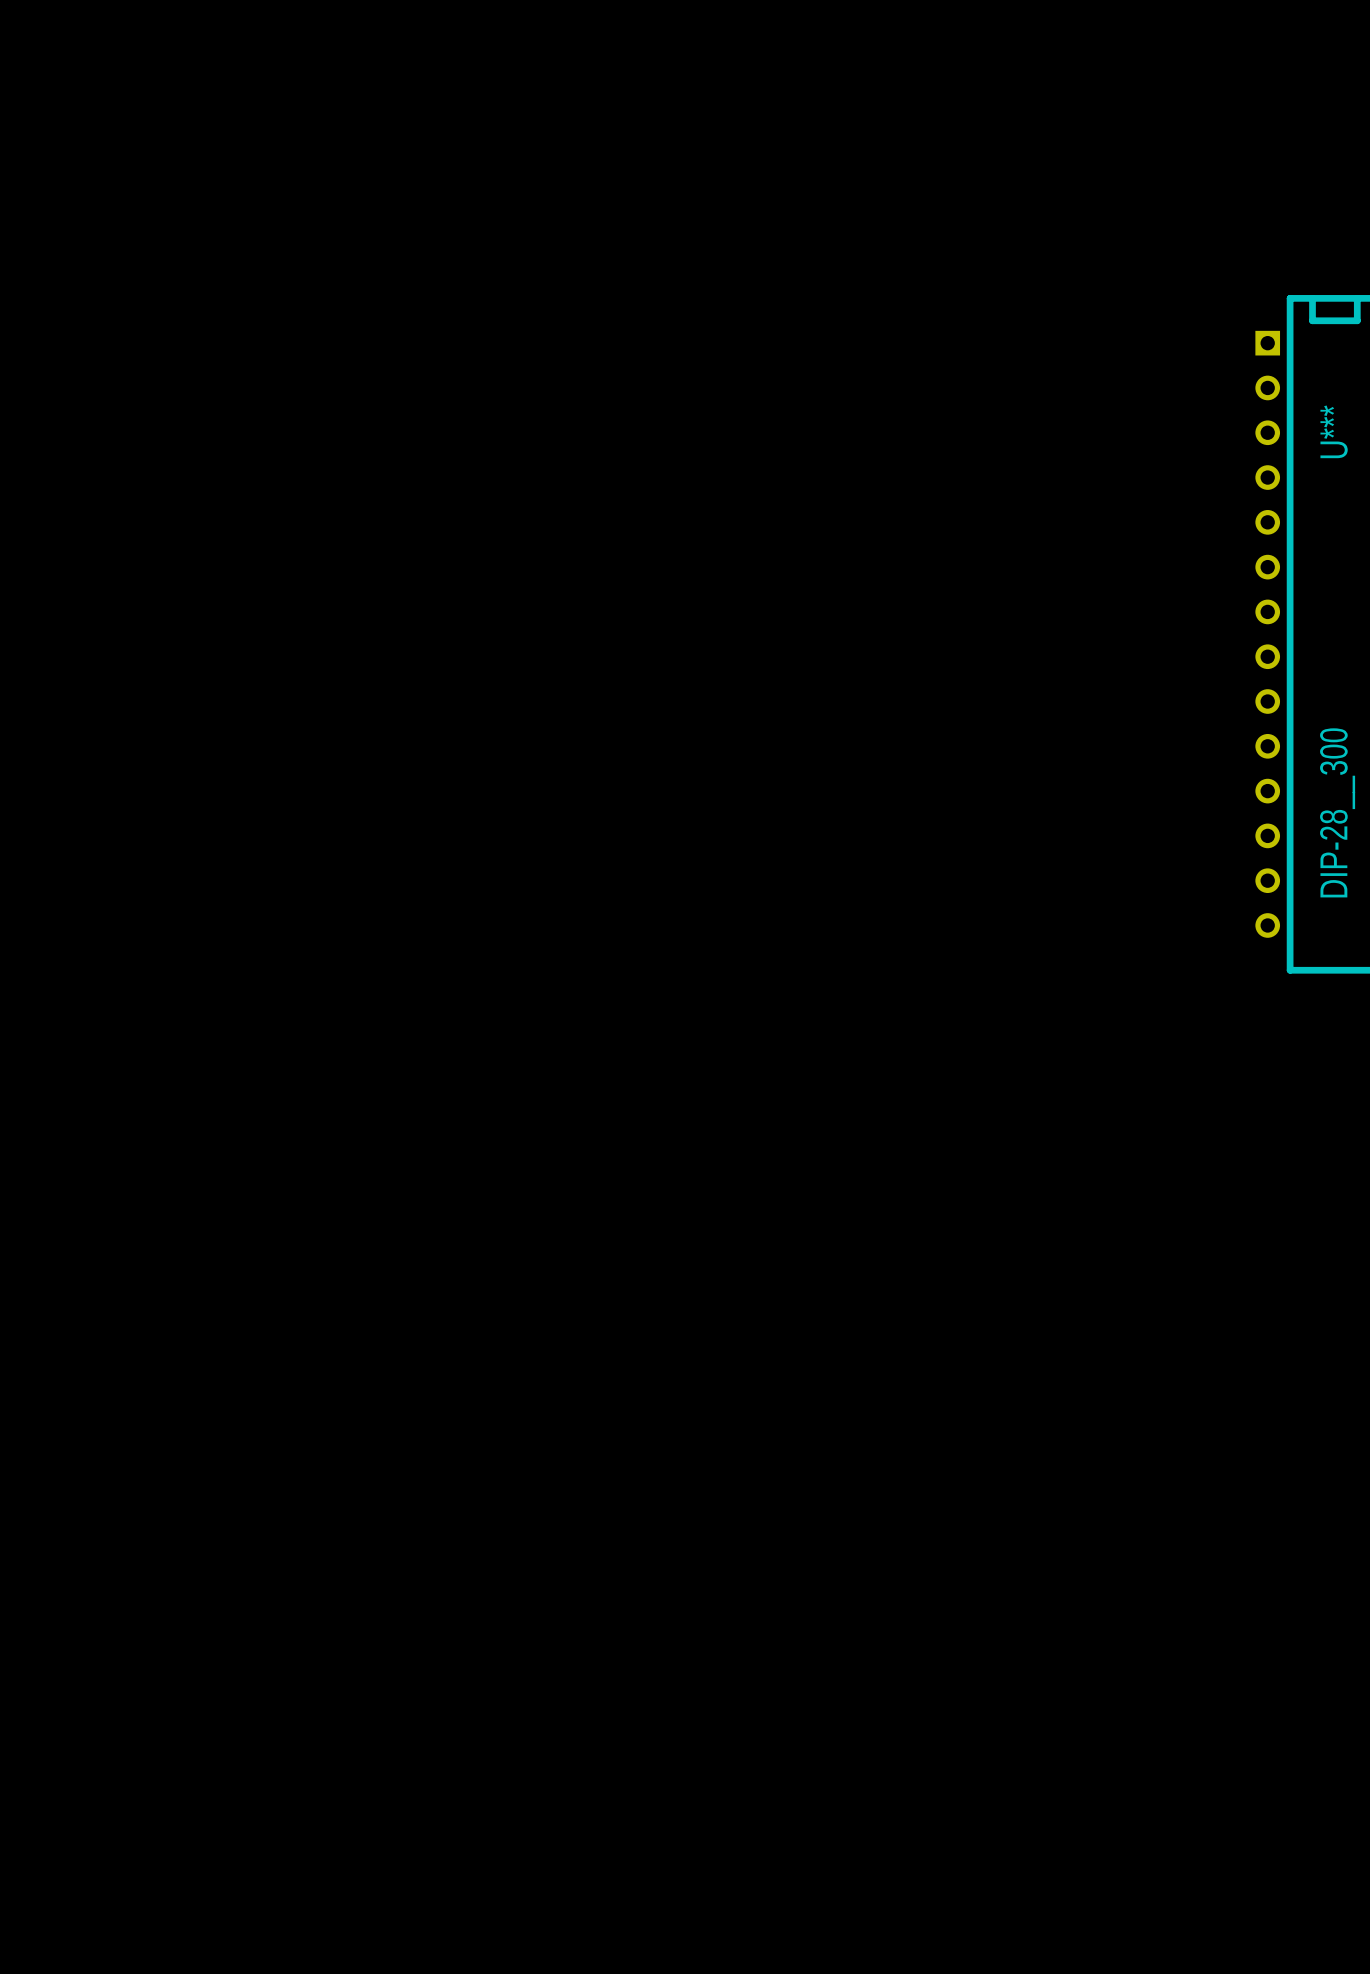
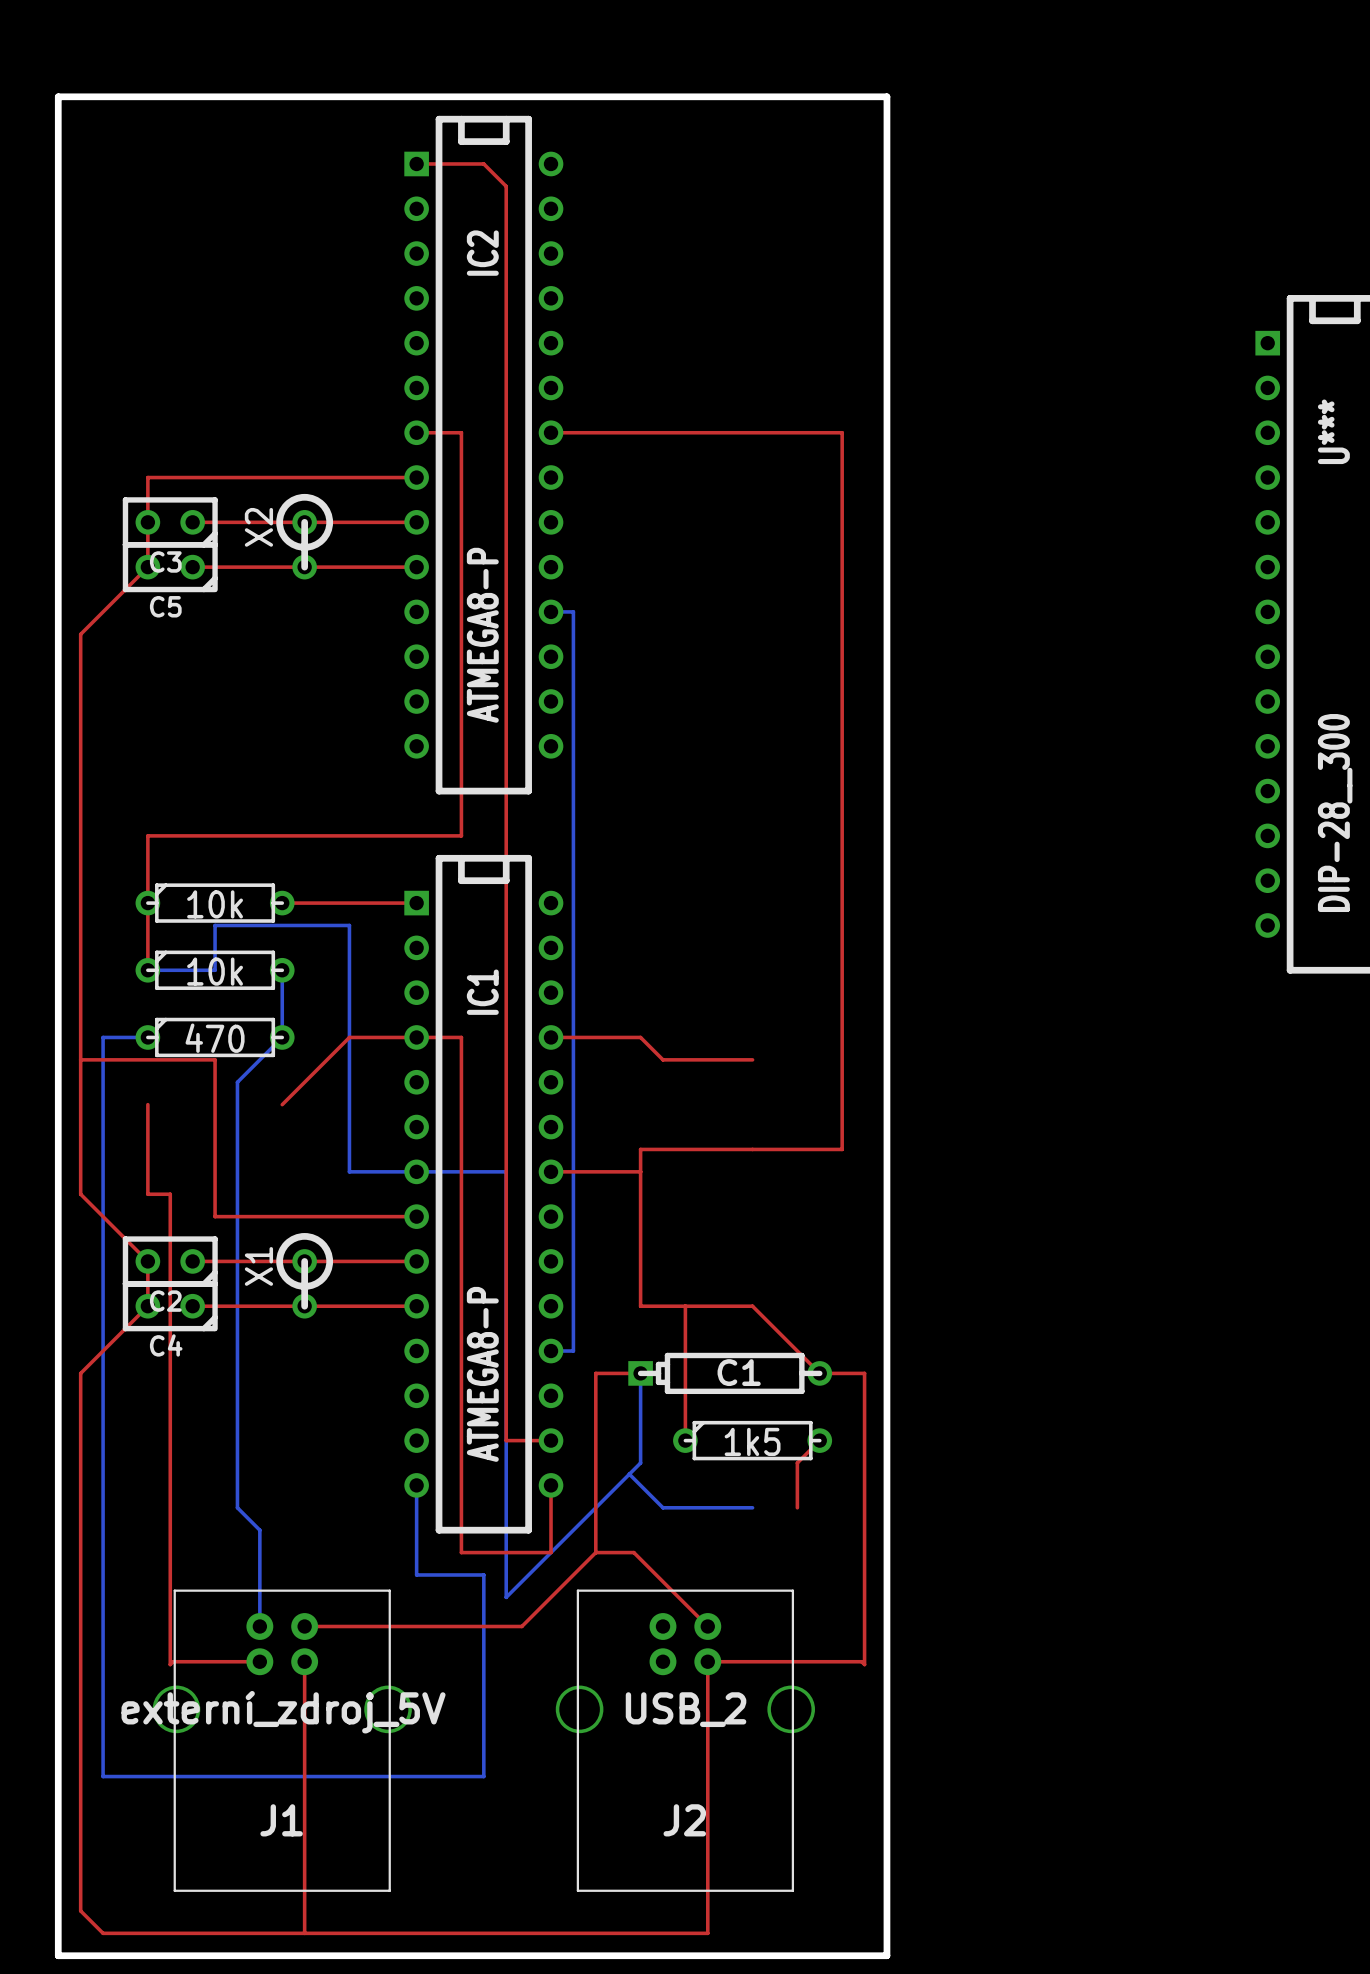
board edge: none -> (58, 96) (886, 96) (886, 1955) (58, 1955) (58, 96)
top track: none -> (416, 163) (483, 163) (506, 186) (506, 1440) (551, 1440)
top track: none -> (416, 432) (461, 432) (461, 835) (147, 835) (147, 970)
top track: none -> (551, 432) (842, 432) (842, 1149) (640, 1149) (640, 1306) (752, 1306) (819, 1373) (864, 1373) (864, 1664) (861, 1661) (707, 1661) (707, 1933) (103, 1933) (80, 1910) (80, 1373) (147, 1306) (147, 1261) (80, 1194) (80, 634) (147, 567) (147, 477) (416, 477)
IC2: none -> ATMEGA8-P (483, 455)
C3: none -> (170, 522)
top track: none -> (192, 522) (416, 522)
X2: none -> (304, 536)
C5: none -> (170, 567)
top track: none -> (192, 567) (416, 567)
bottom track: none -> (551, 611) (573, 611) (573, 1351) (551, 1351)
part: none -> 10k (215, 903)
top track: none -> (282, 903) (416, 903)
bottom track: none -> (147, 970) (215, 970) (215, 925) (349, 925) (349, 1171) (506, 1171) (506, 1597) (640, 1463) (640, 1373)
part: none -> 10k (215, 970)
bottom track: none -> (282, 970) (282, 1037) (237, 1082) (237, 1507) (259, 1530) (259, 1626)
bottom track: none -> (147, 1037) (103, 1037) (103, 1776) (483, 1776) (483, 1574) (416, 1574) (416, 1485)
part: none -> 470 (215, 1037)
top track: none -> (551, 1037) (640, 1037) (662, 1059) (752, 1059)
top track: none -> (80, 1059) (215, 1059) (215, 1216) (416, 1216)
top track: none -> (147, 1104) (147, 1194) (170, 1194) (170, 1664) (173, 1661) (259, 1661)
top track: none -> (282, 1104) (349, 1037) (461, 1037) (461, 1552) (551, 1552) (551, 1485)
top track: none -> (551, 1171) (640, 1171)
IC1: none -> ATMEGA8-P (483, 1194)
C2: none -> (170, 1261)
top track: none -> (192, 1261) (416, 1261)
X1: none -> (304, 1275)
C4: none -> (170, 1306)
top track: none -> (192, 1306) (416, 1306)
top track: none -> (685, 1306) (685, 1440)
top track: none -> (640, 1373) (595, 1373) (595, 1552)
C1: none -> (730, 1373)
part: none -> 1k5 (752, 1440)
top track: none -> (819, 1440) (797, 1463) (797, 1507)
bottom track: none -> (629, 1474) (662, 1507) (752, 1507)
top track: none -> (595, 1552) (633, 1552) (707, 1626)
top track: none -> (595, 1552) (521, 1626) (304, 1626)
top track: none -> (304, 1661) (304, 1933)
J1: none -> externí_zdroj_5V (282, 1740)
J2: none -> USB_2 (685, 1740)

